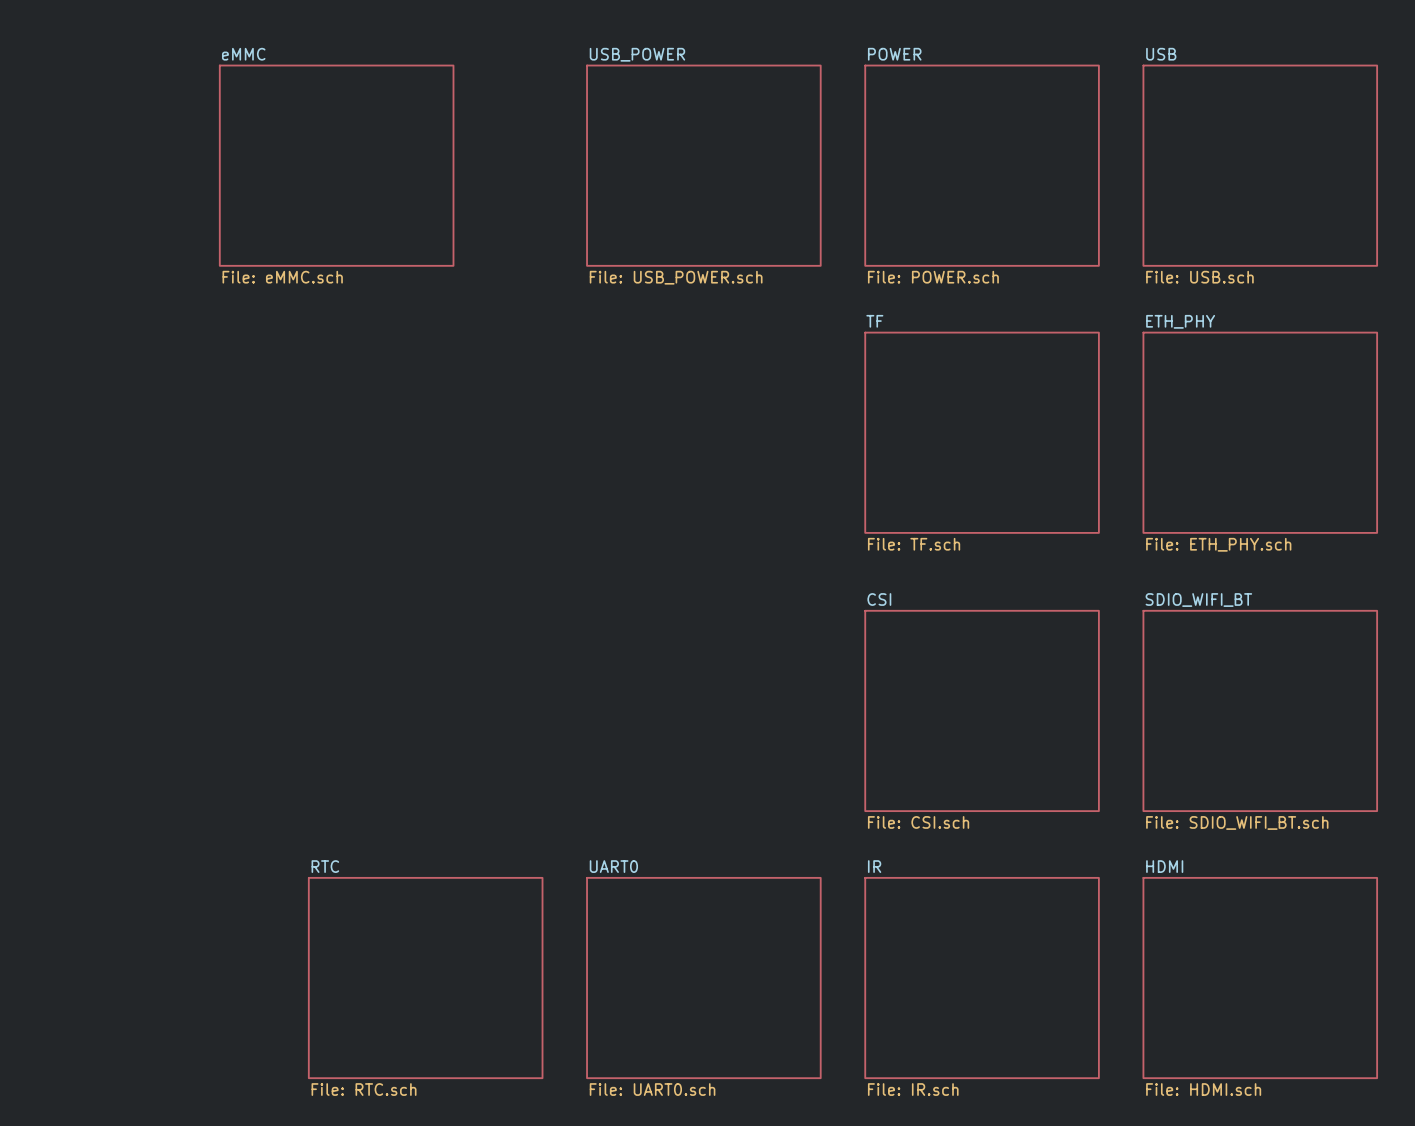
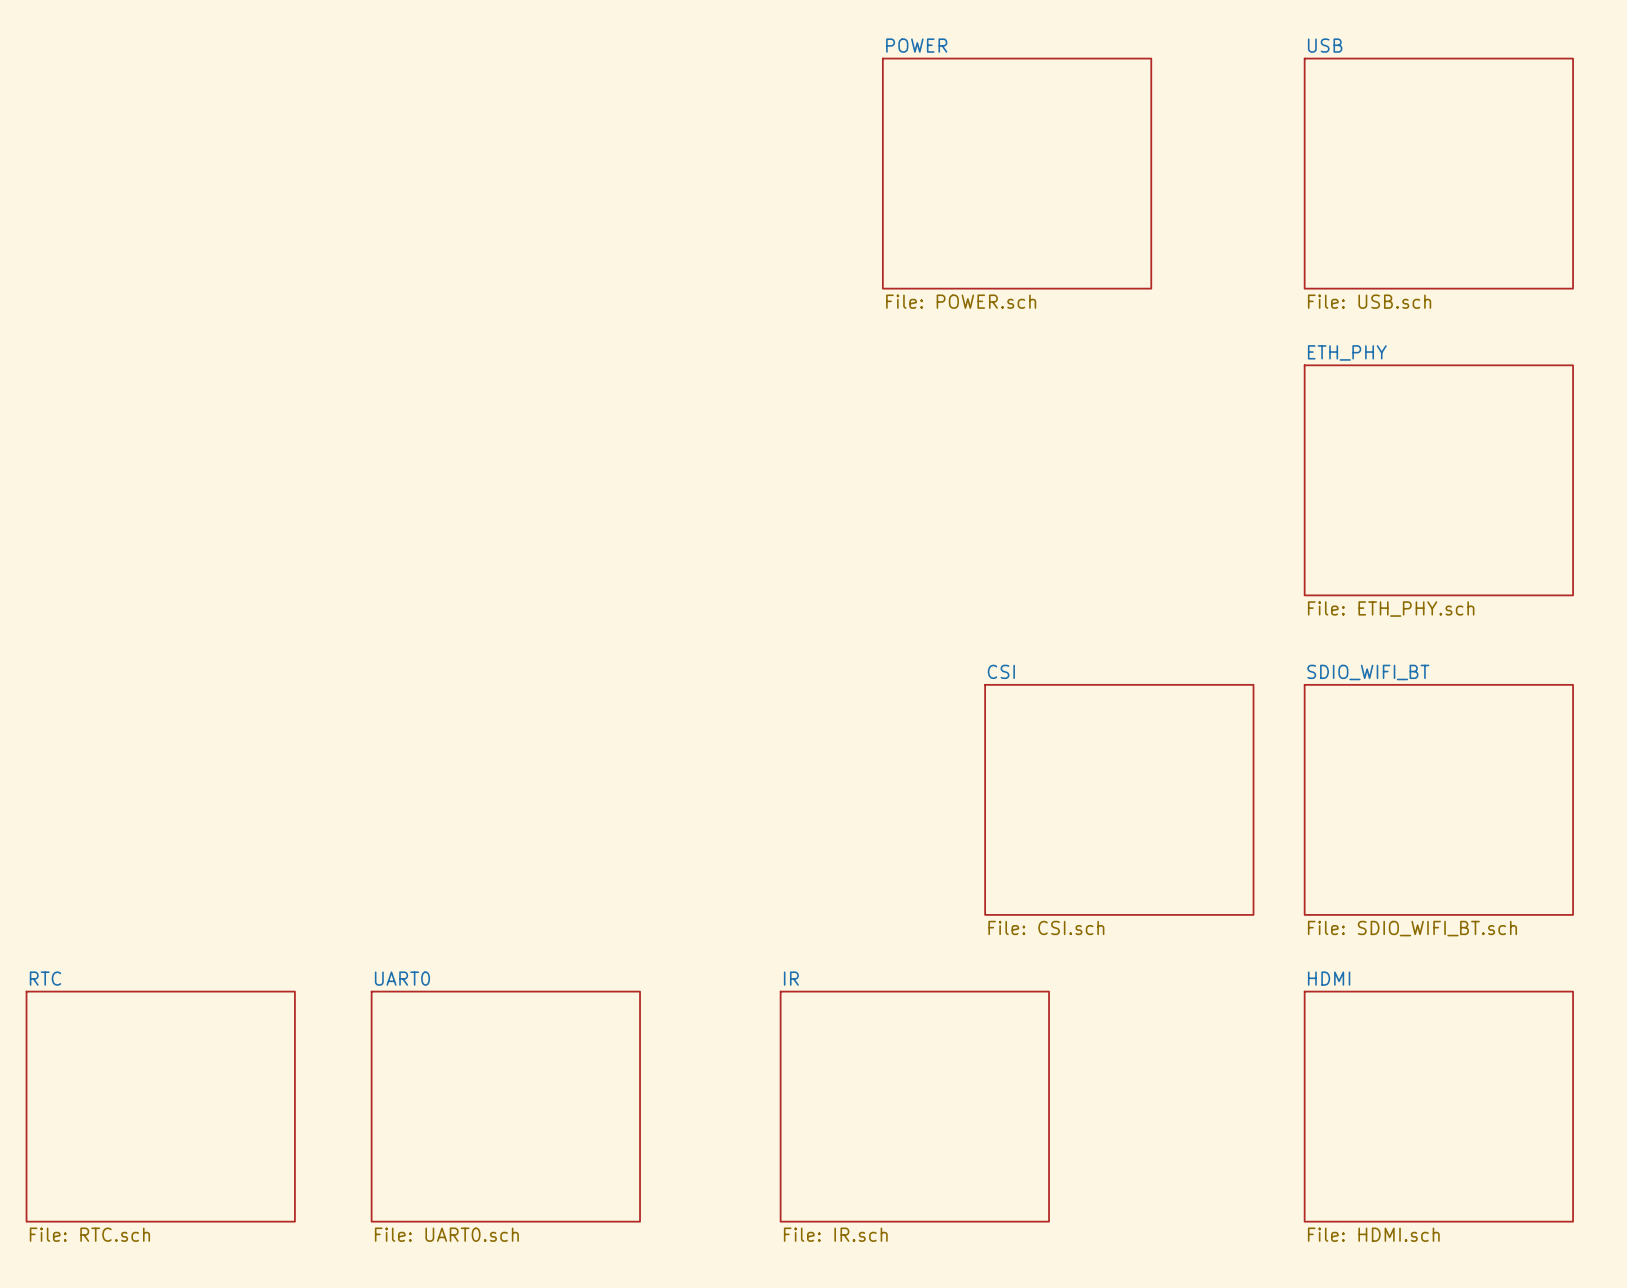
sheet eMMC: File: eMMC.sch (336, 165) -> none
sheet USB_POWER: File: USB_POWER.sch (703, 165) -> none
sheet POWER position: (982, 165) -> (1017, 173)
sheet TF: File: TF.sch (982, 432) -> none
sheet RTC: none -> File: RTC.sch (160, 1106)
sheet RTC: File: RTC.sch (425, 978) -> none
sheet UART0 position: (703, 978) -> (505, 1106)
sheet IR position: (982, 978) -> (914, 1106)

